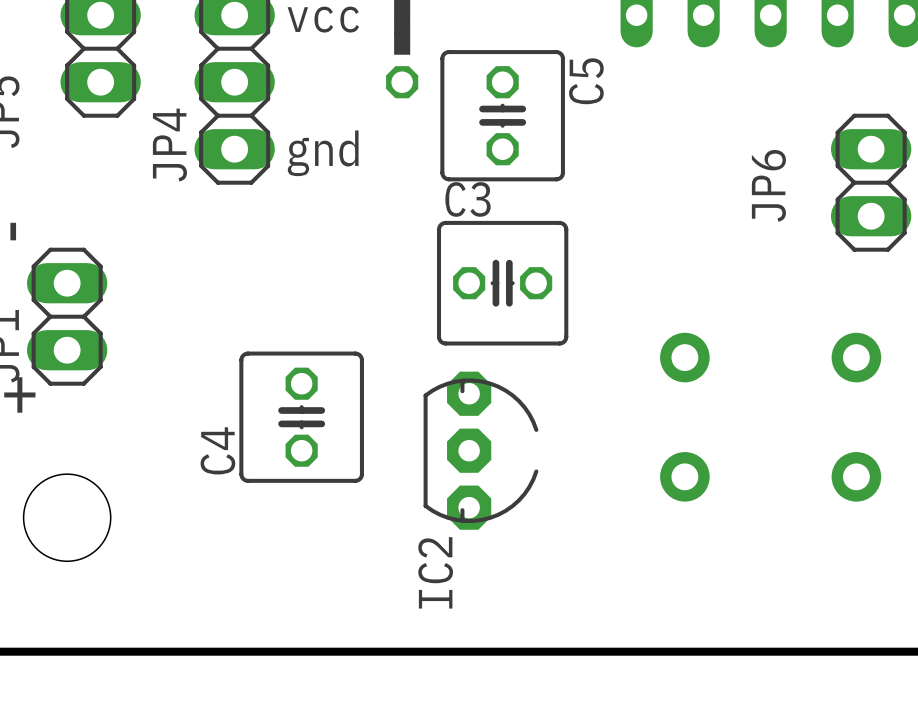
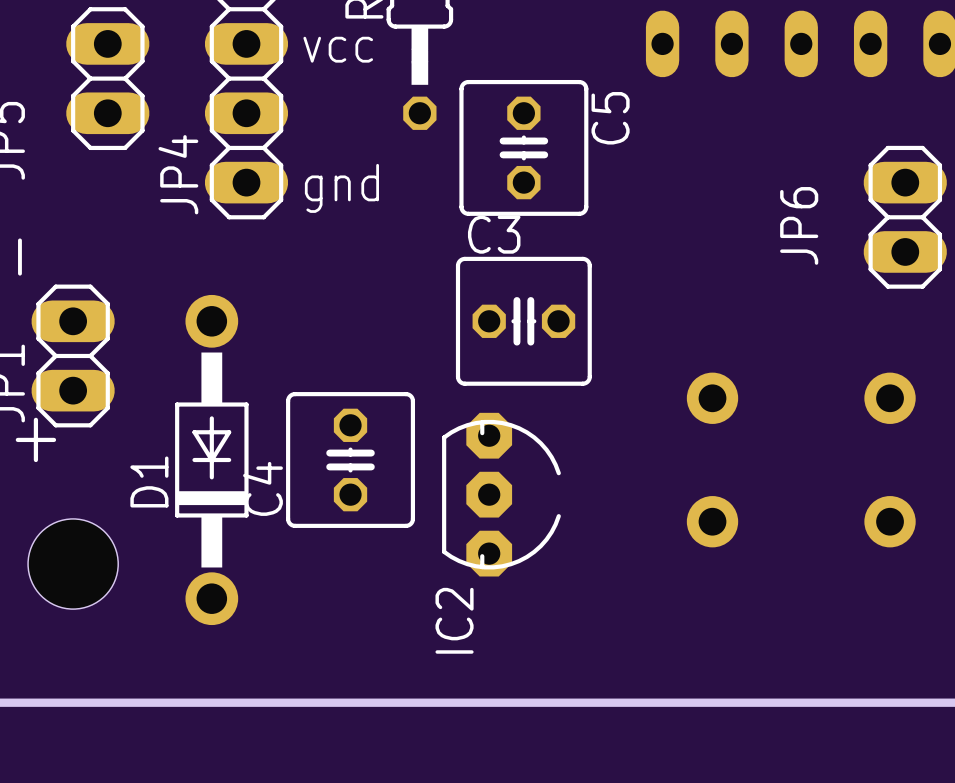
D1: none -> (211, 460)
C4 position: (301, 417) -> (350, 460)

